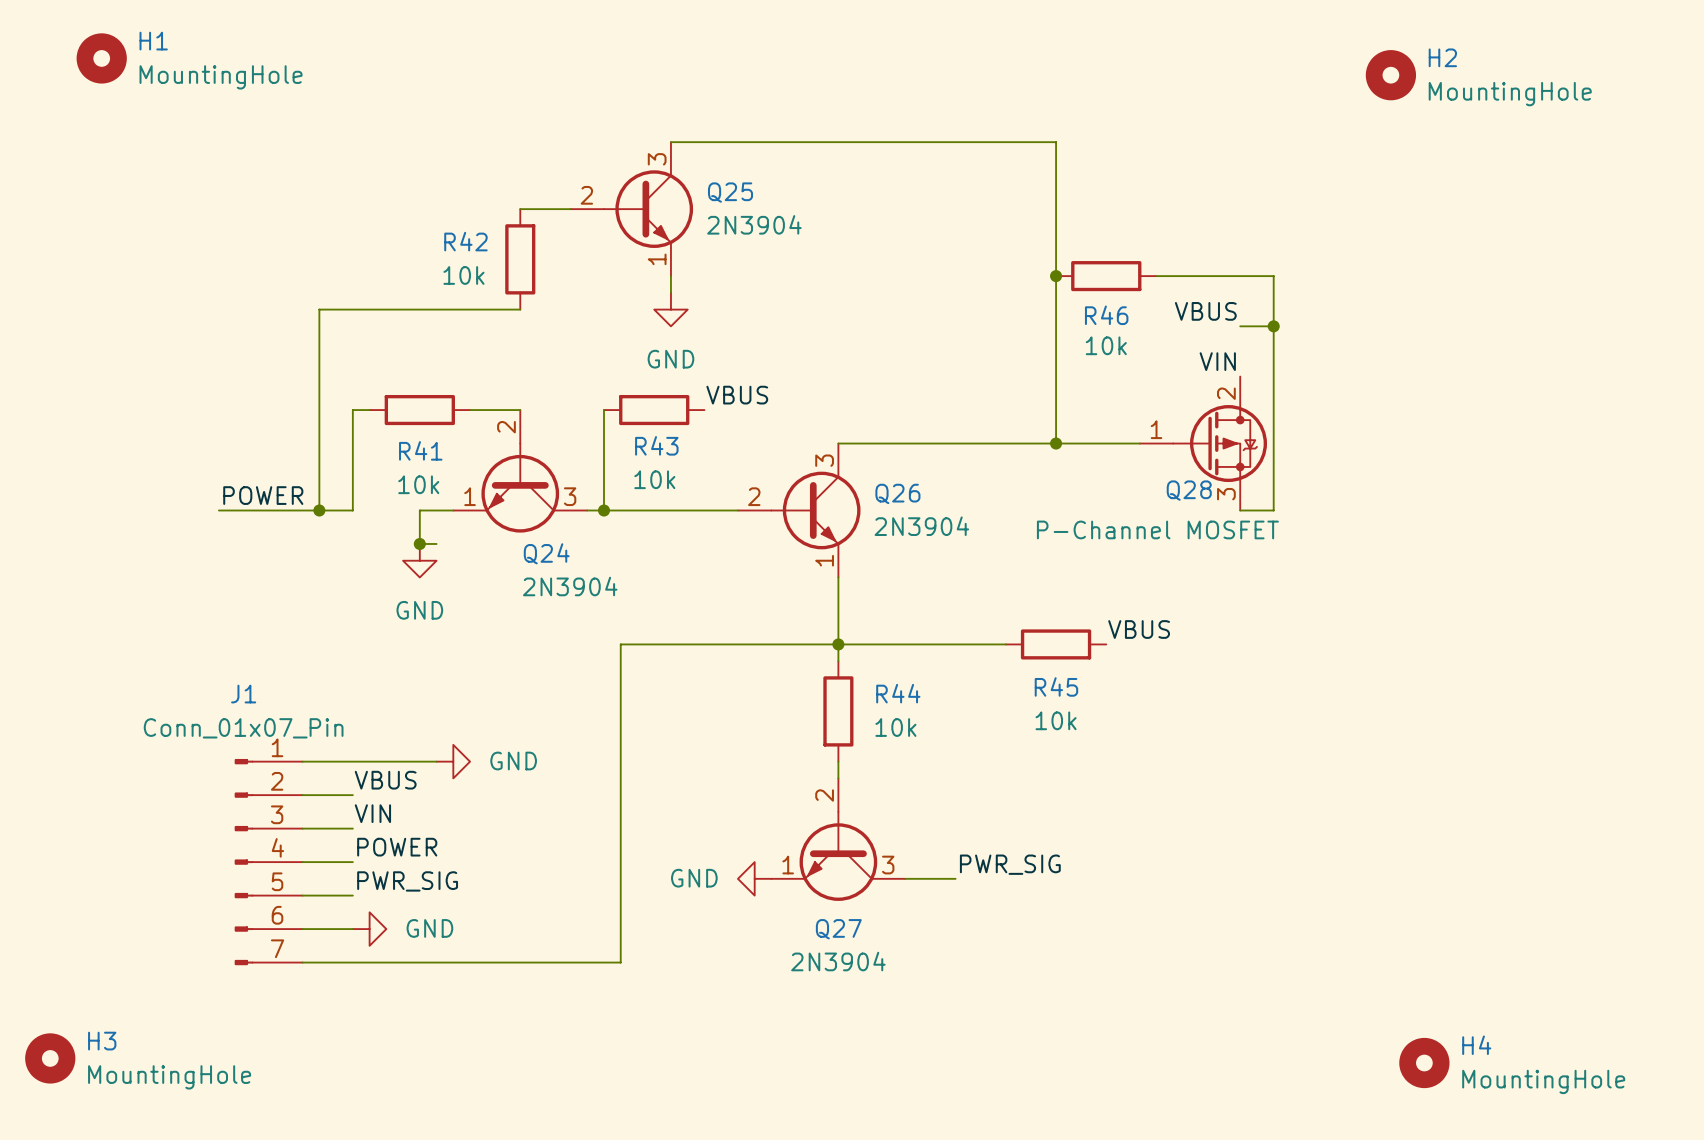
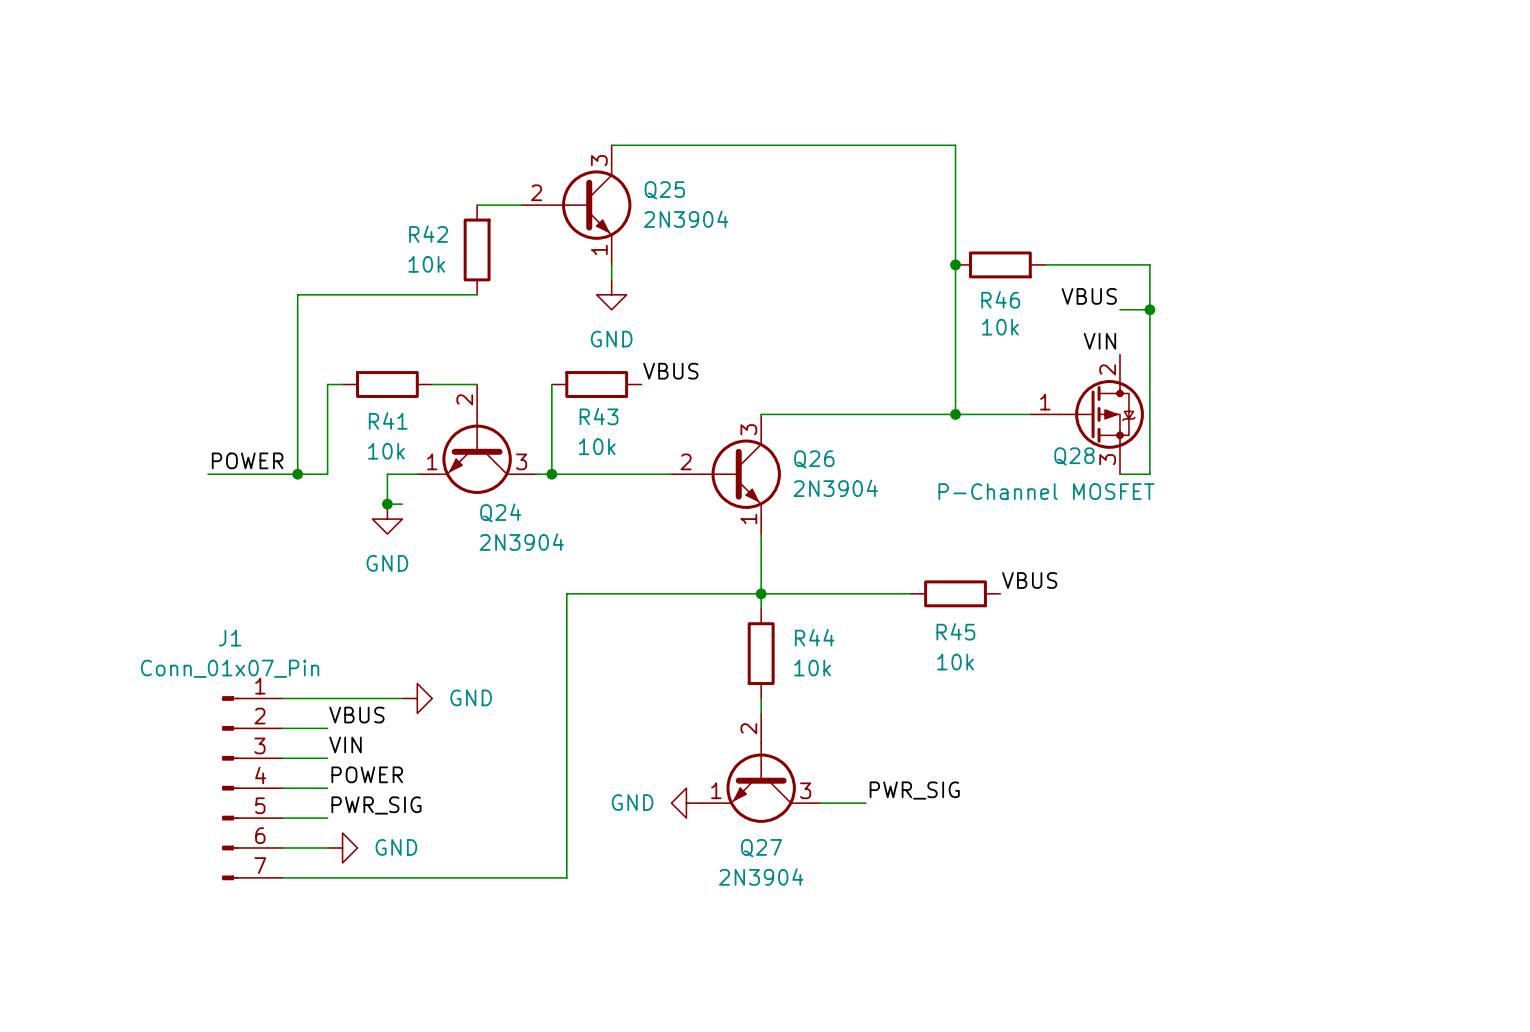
H1: MountingHole (101, 58) -> none
H2: MountingHole (1390, 75) -> none
H3: MountingHole (50, 1058) -> none
H4: MountingHole (1424, 1063) -> none

